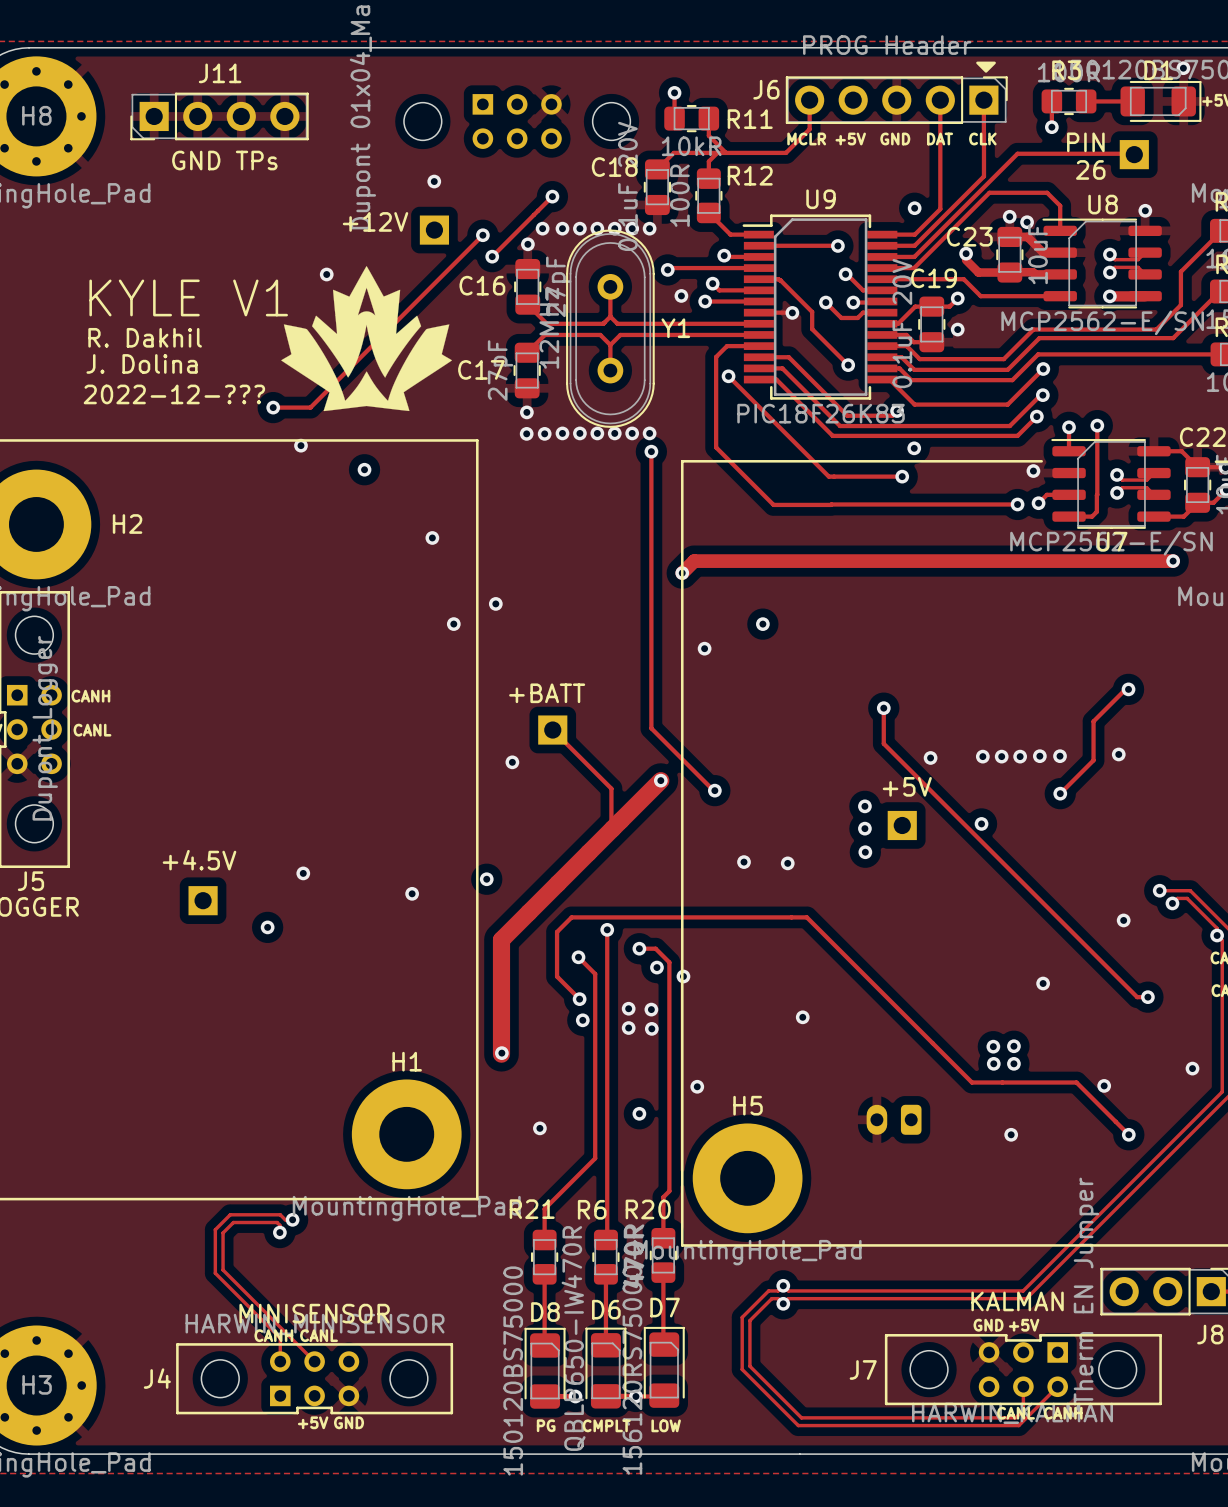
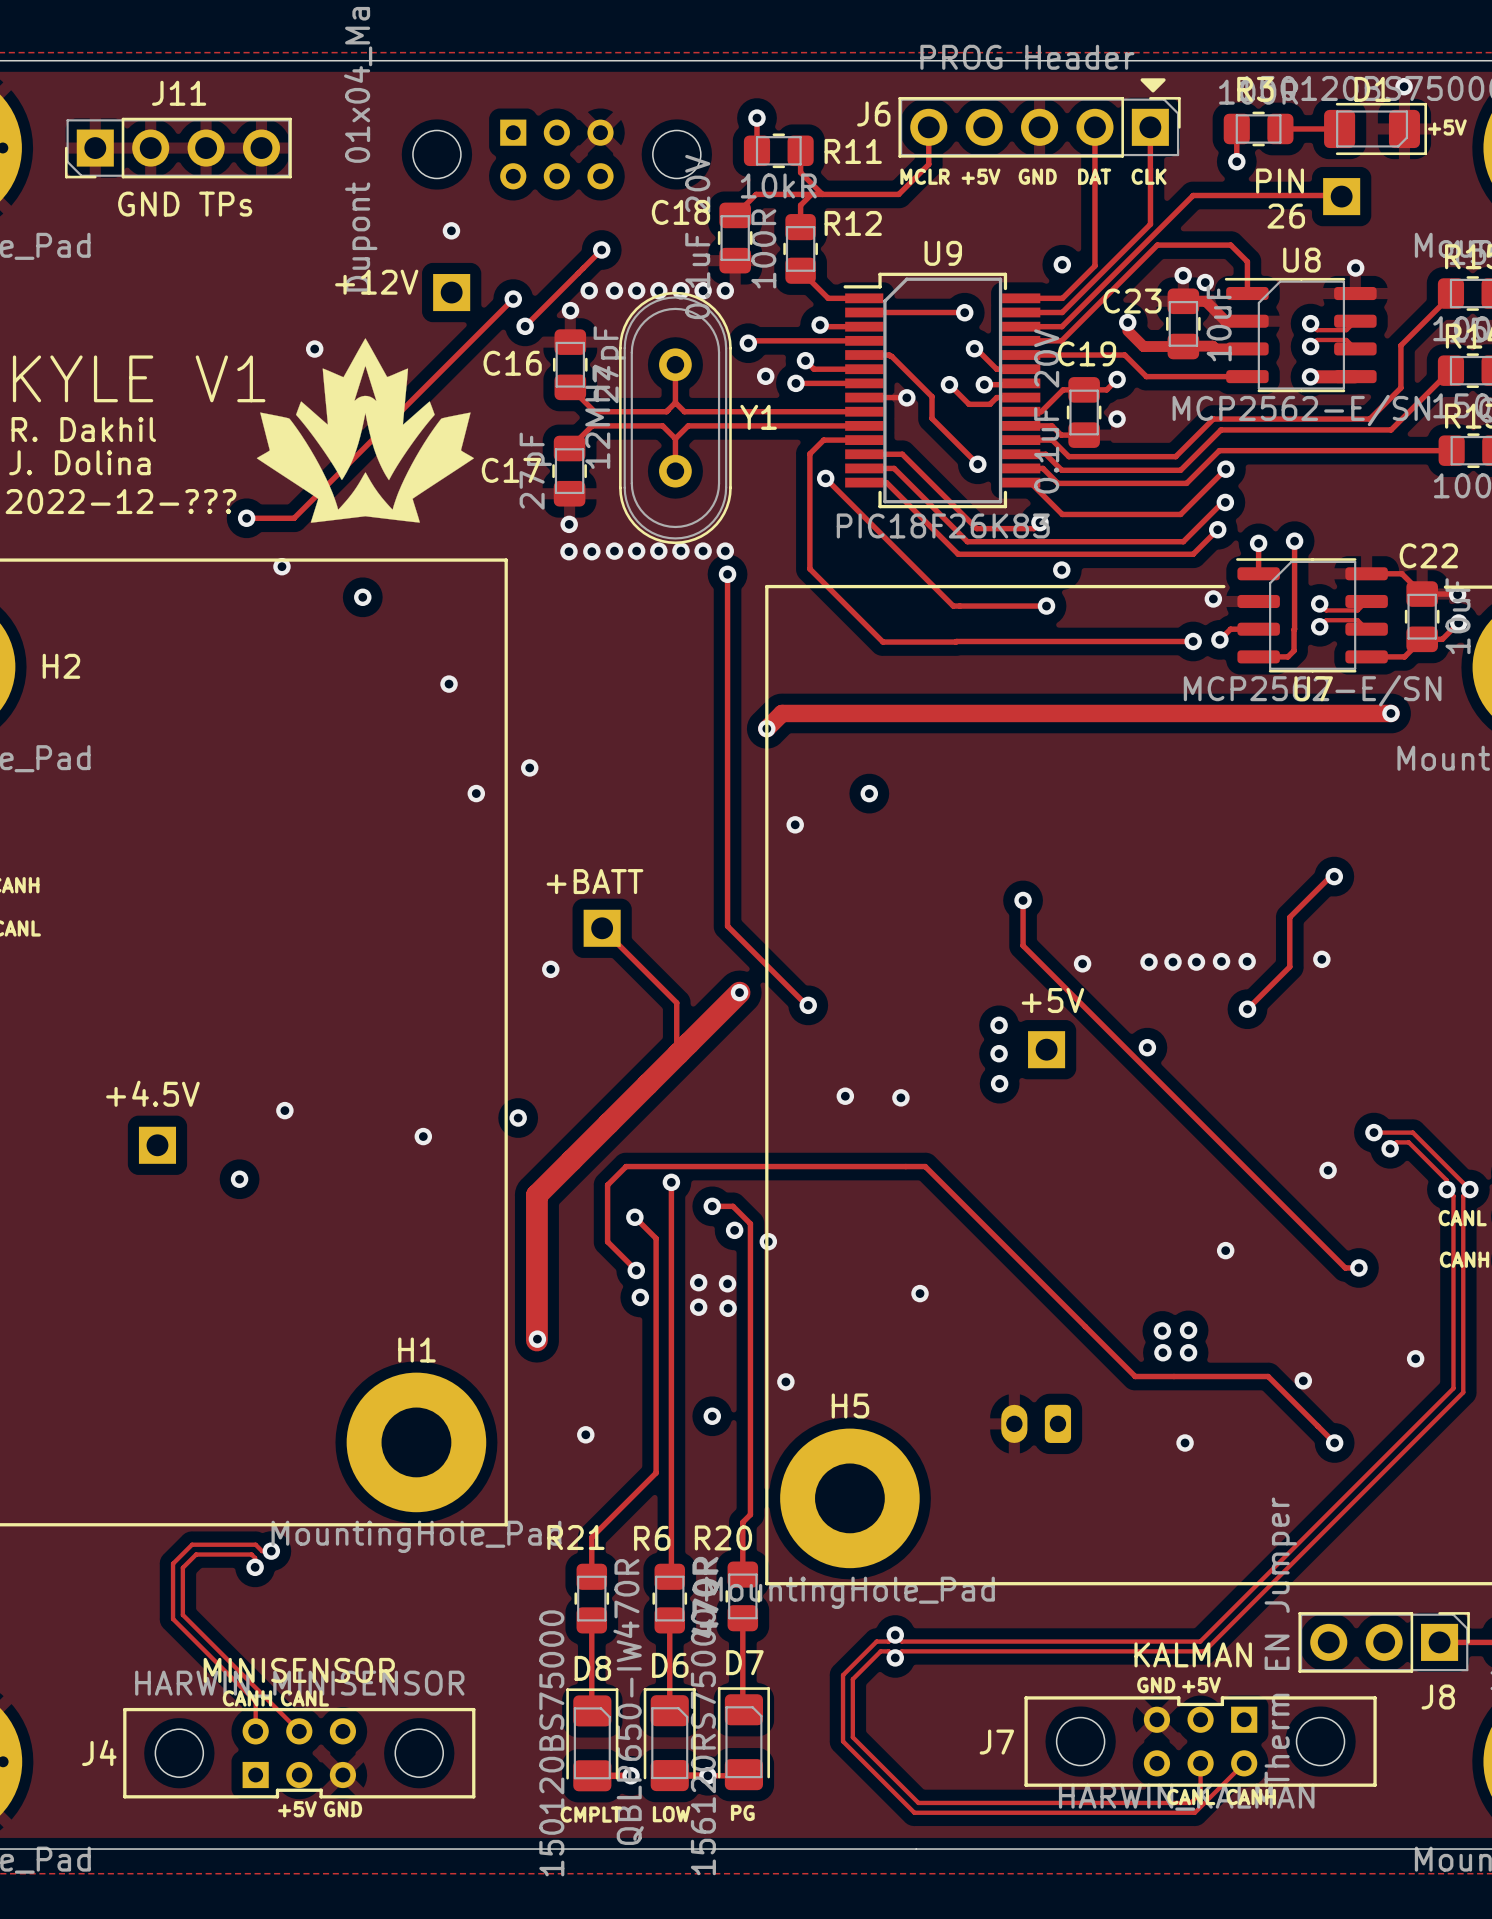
text position: PG (546, 1425) -> PG (742, 1812)
text: CMPLT (606, 1425) -> LOW (671, 1814)
text: LOW (666, 1425) -> none
text: none -> CMPLT (591, 1814)

